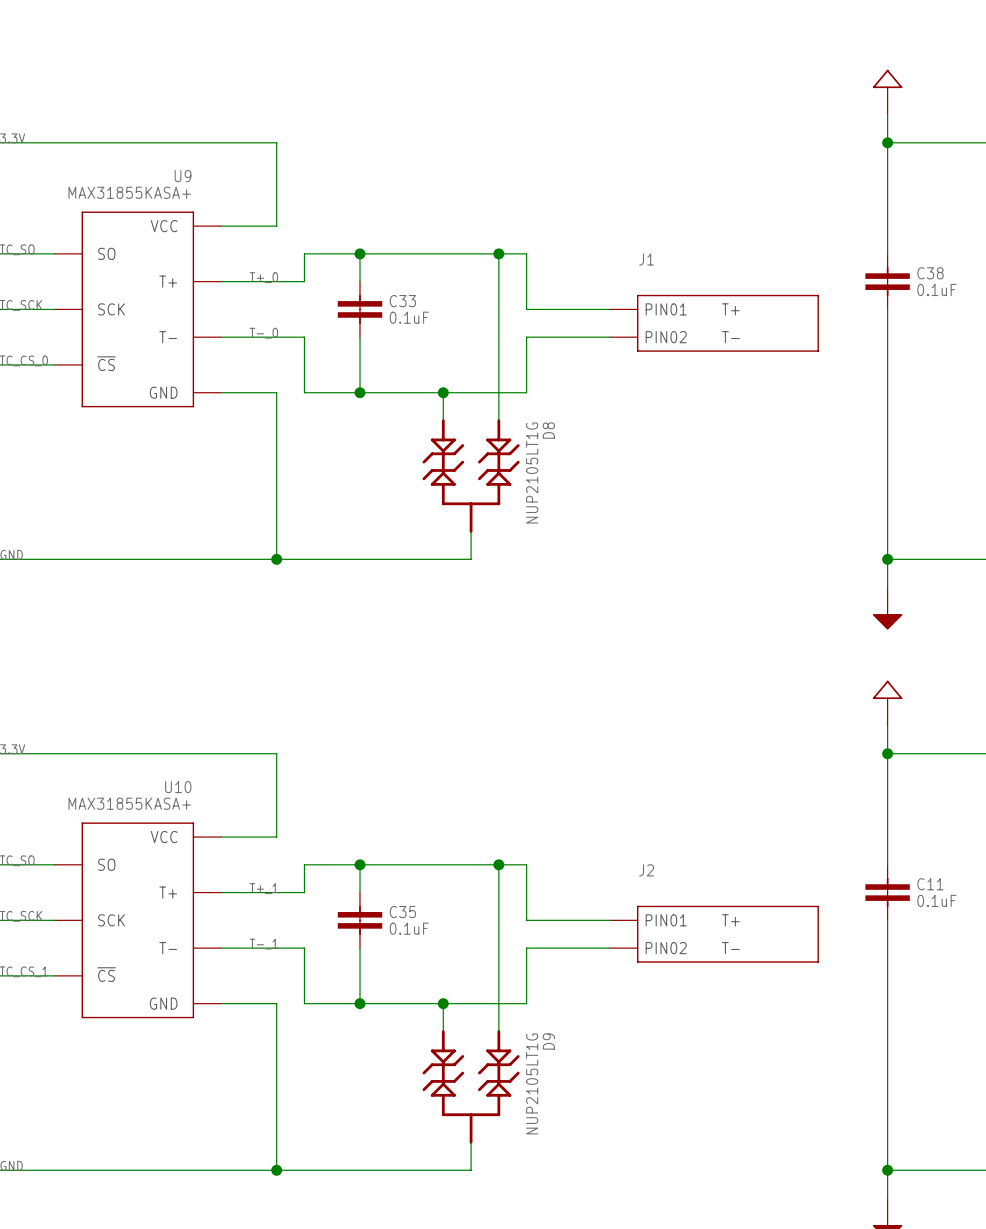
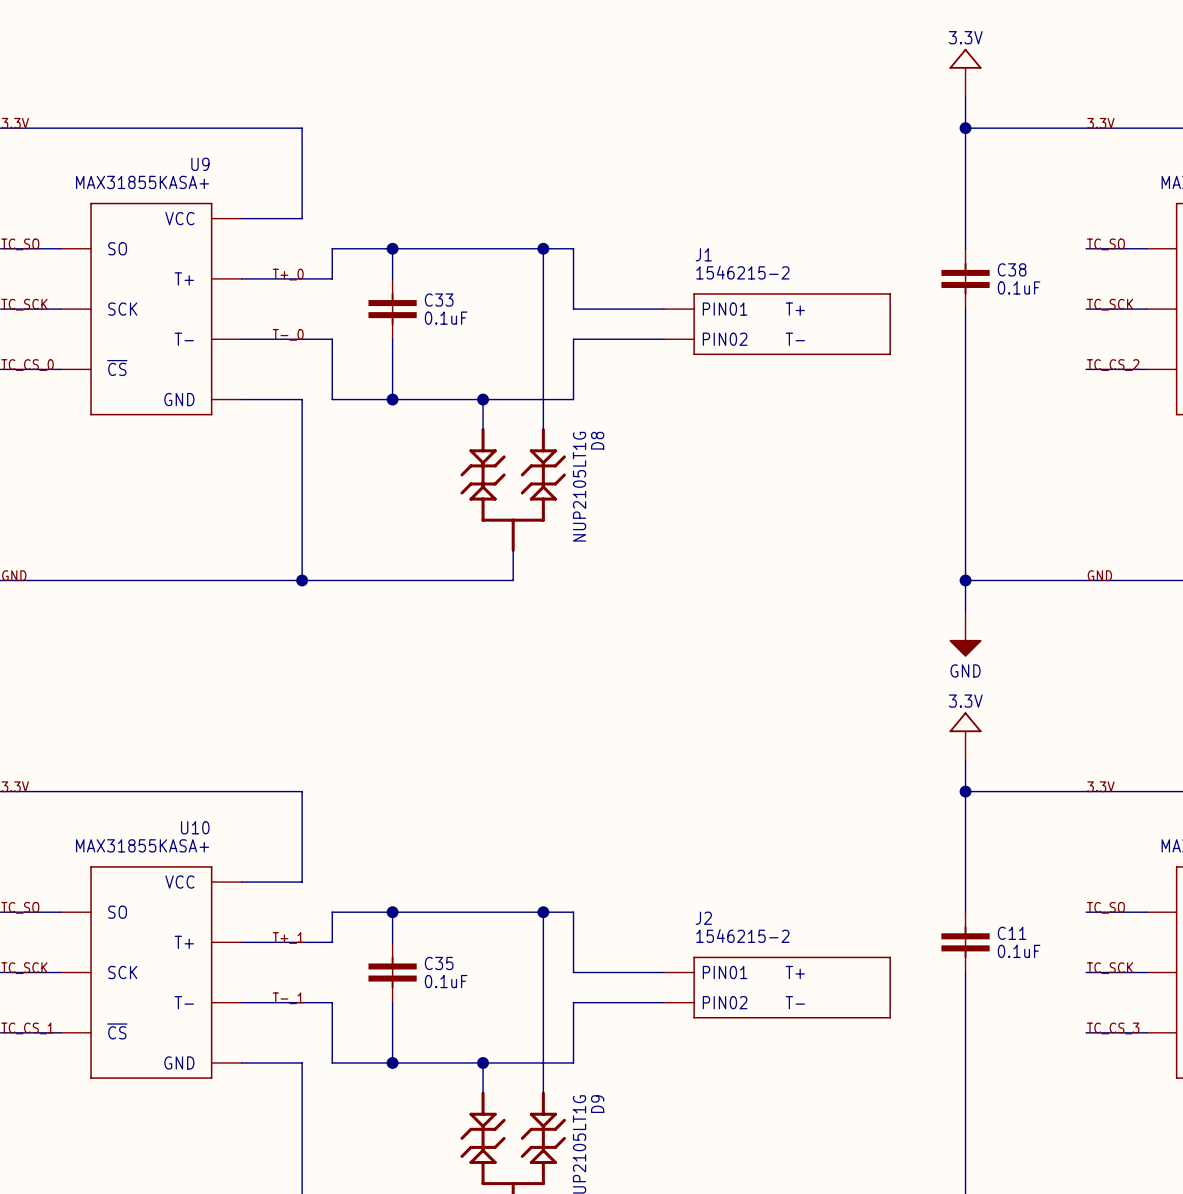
power symbol text: none -> 3.3V (965, 37)
J1 value: none -> 1546215-2 (742, 272)
power symbol text: none -> GND (965, 670)
power symbol text: none -> 3.3V (965, 701)
J2 value: none -> 1546215-2 (742, 936)

